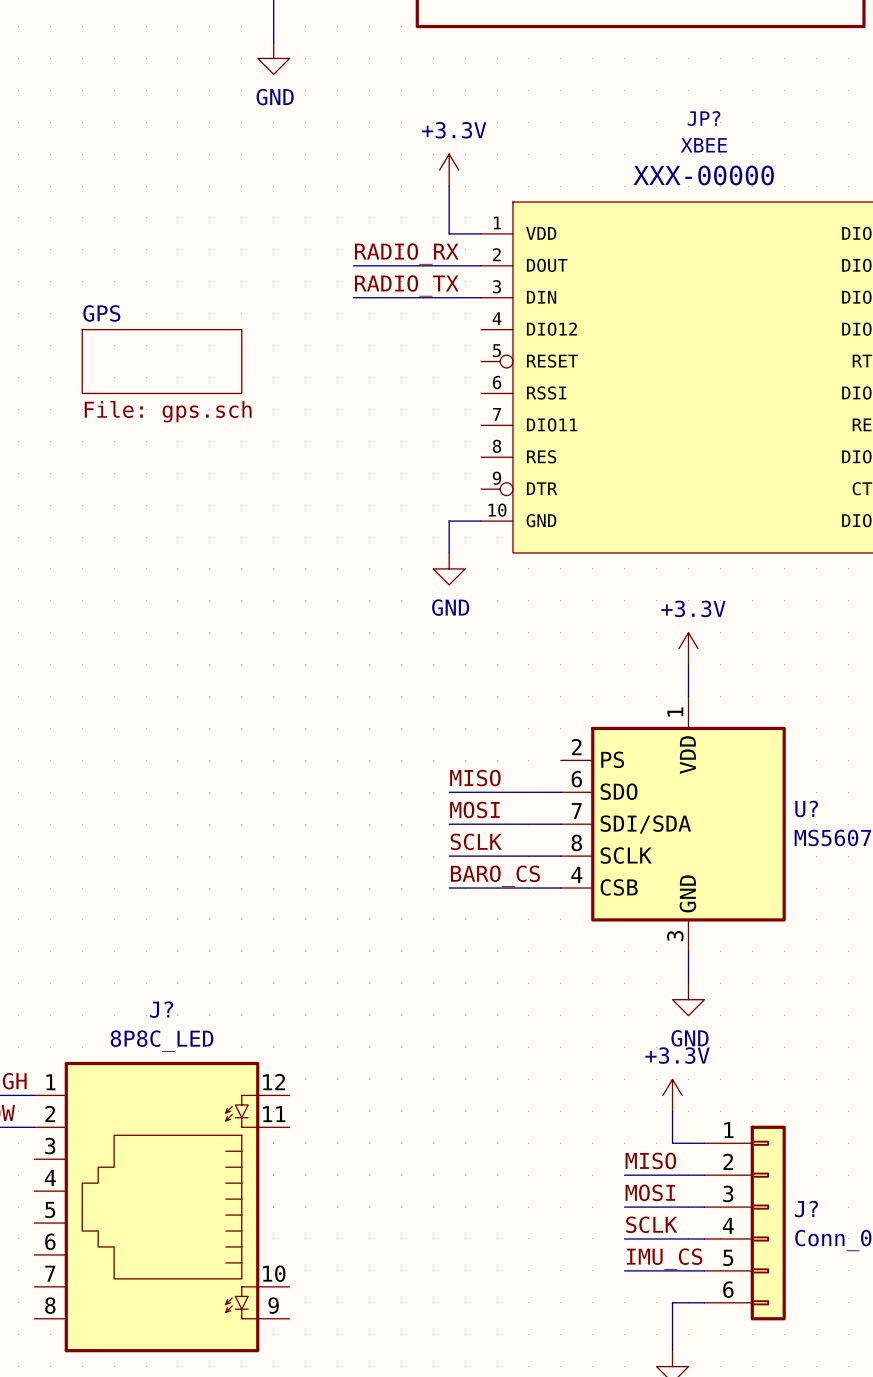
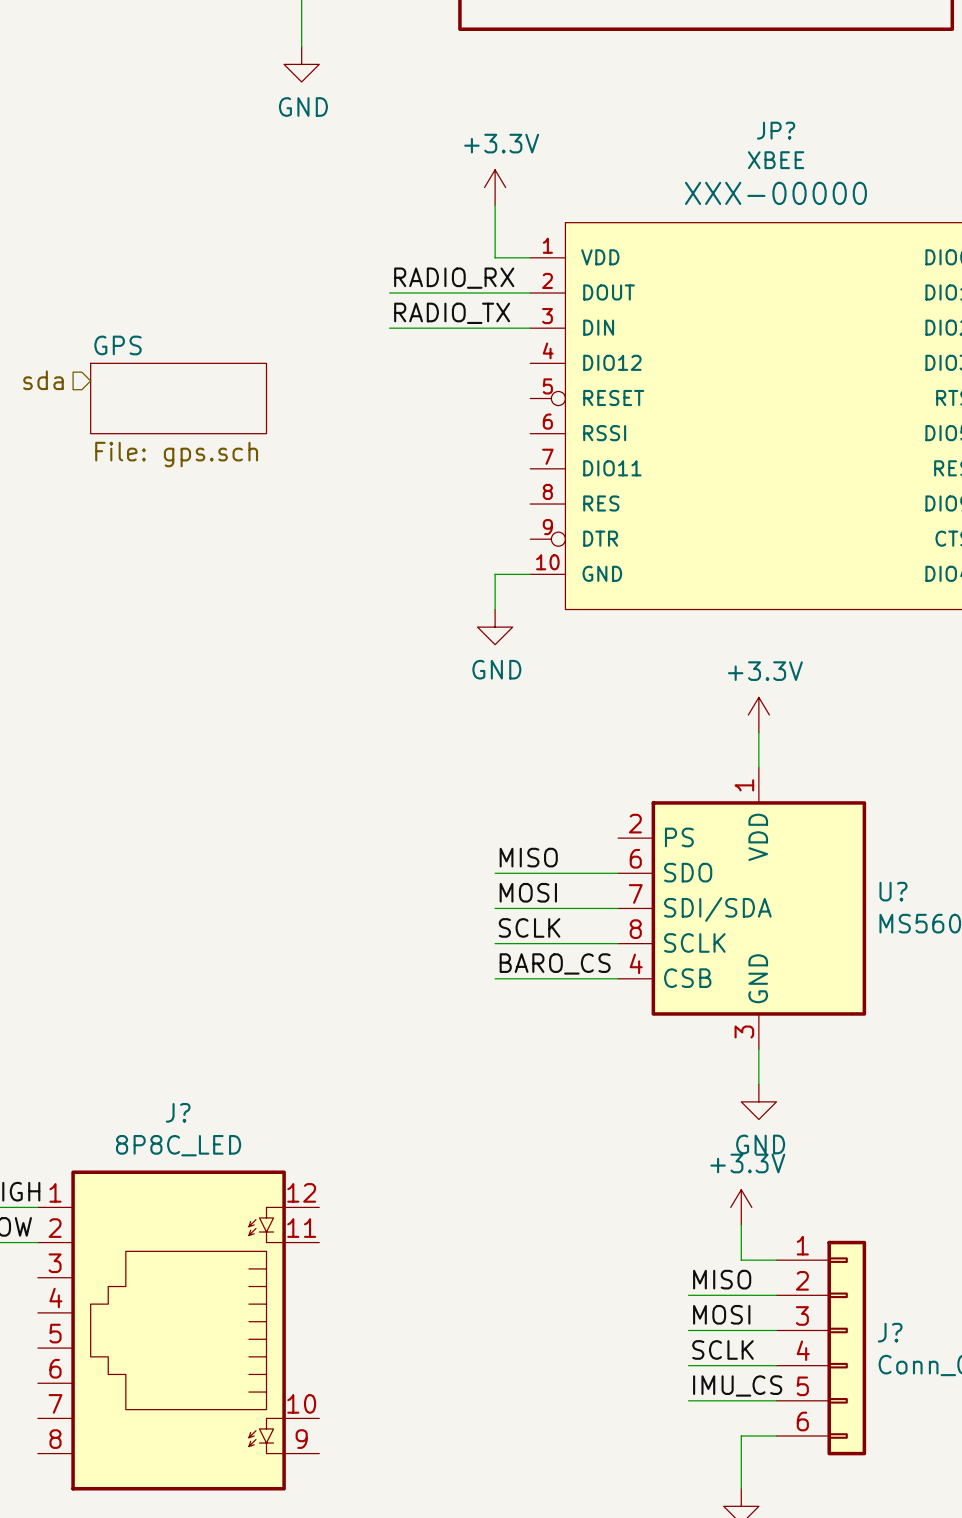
hierarchical label: none -> sda (43, 380)

